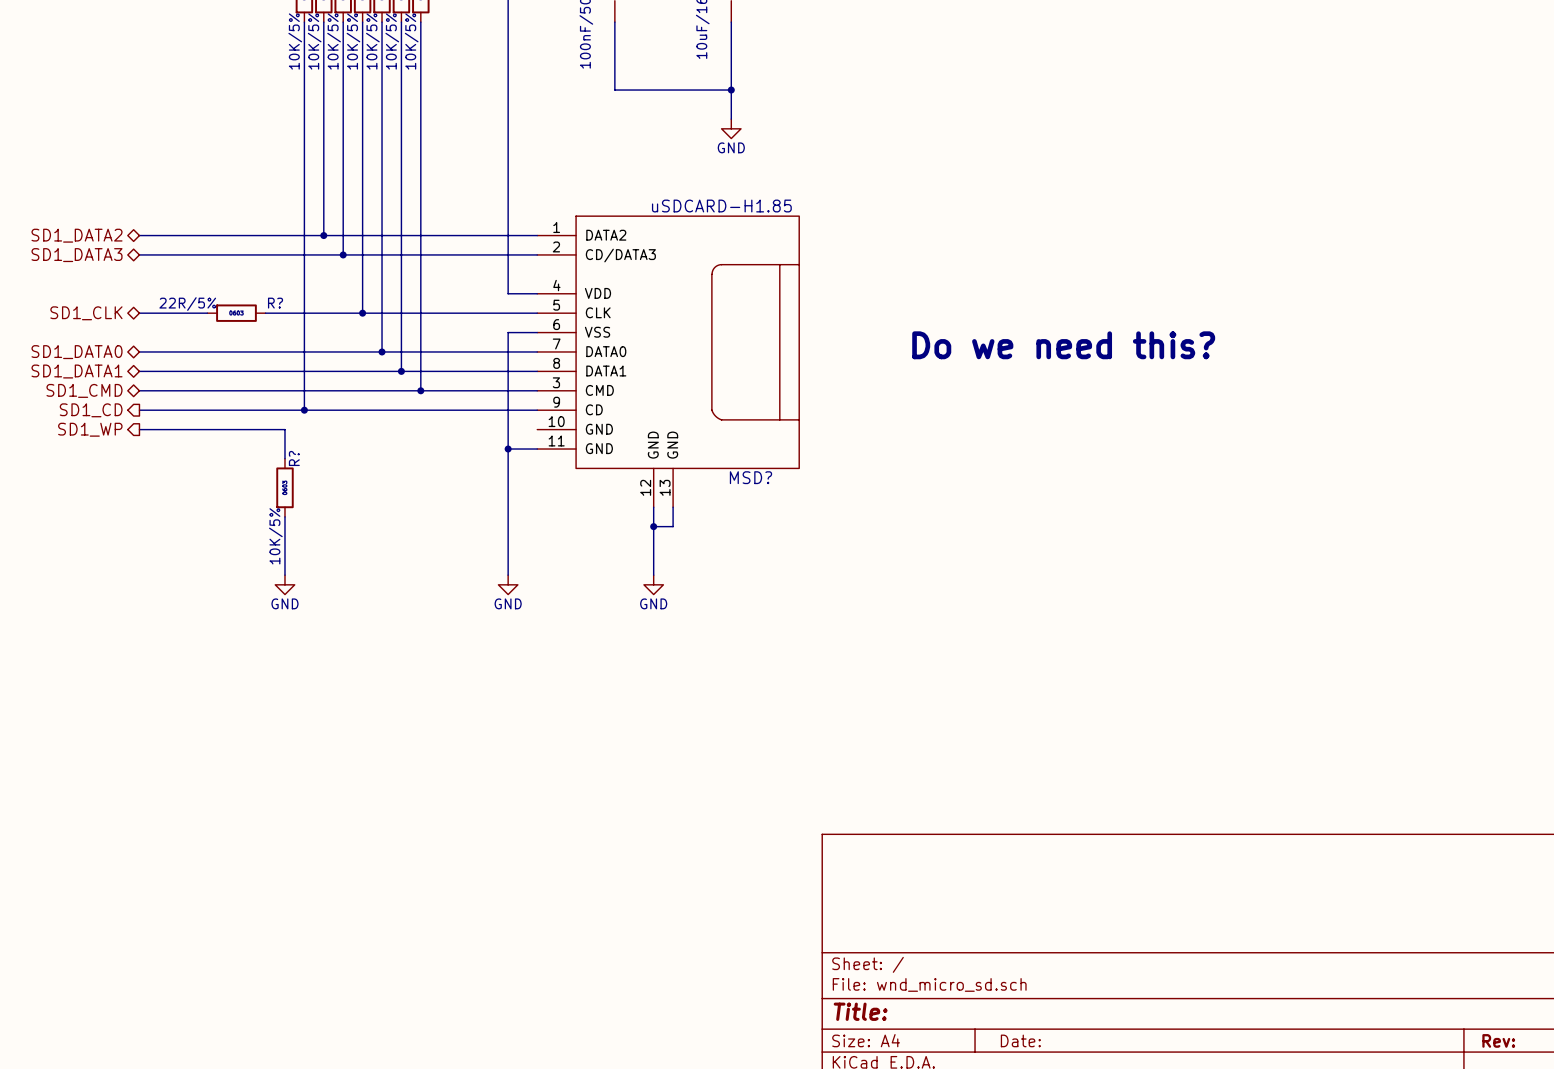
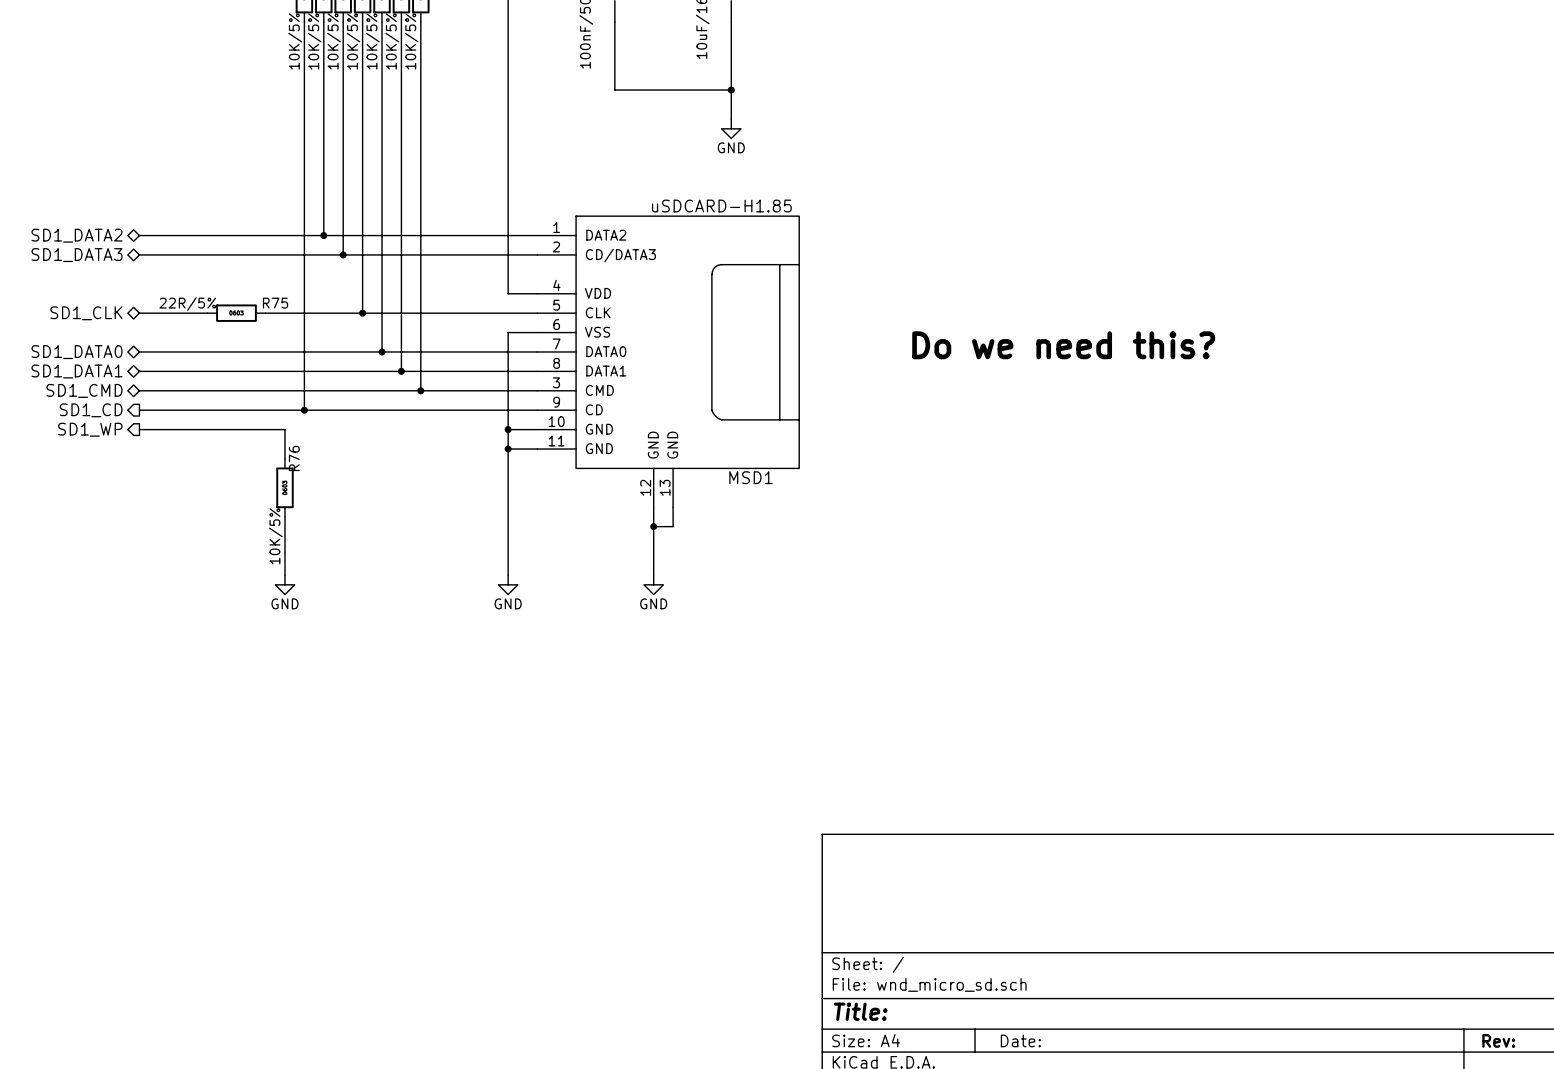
R? name: R? (275, 303) -> R75 (275, 303)
wire: none -> (508, 429) (537, 429)
junction: none -> (508, 429)
R? name: R? (294, 458) -> R76 (294, 458)
MSD? name: MSD? (750, 477) -> MSD1 (750, 477)

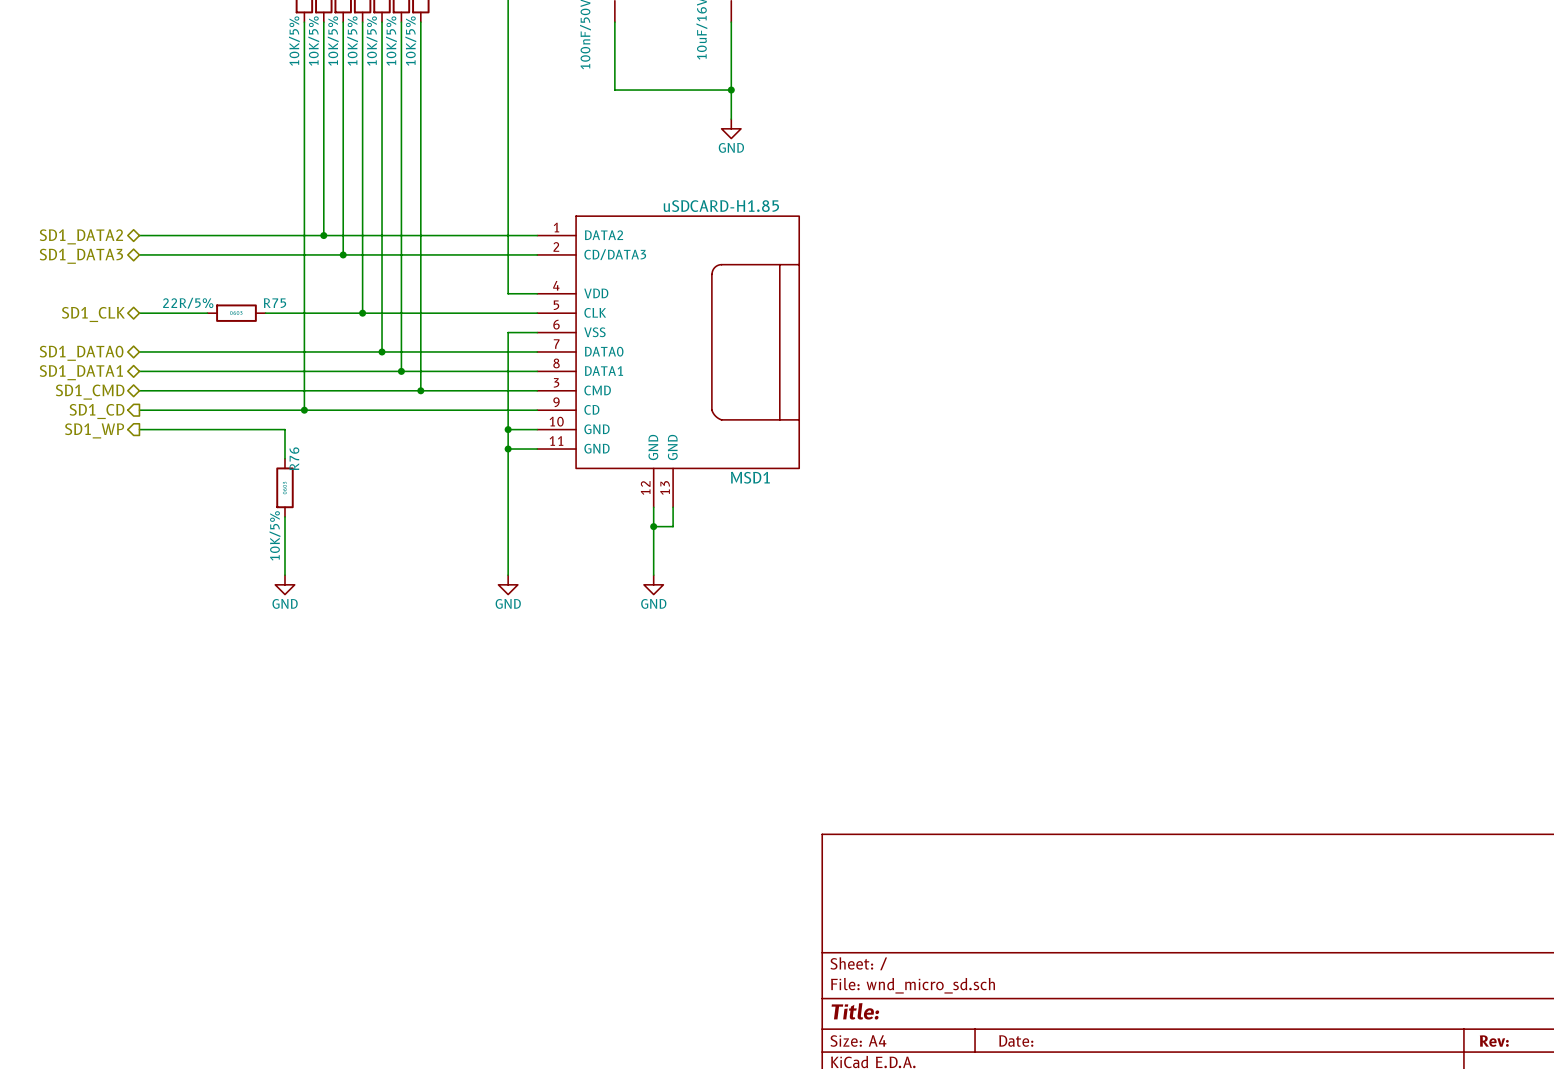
text: Do we need this? (1063, 345) -> none

